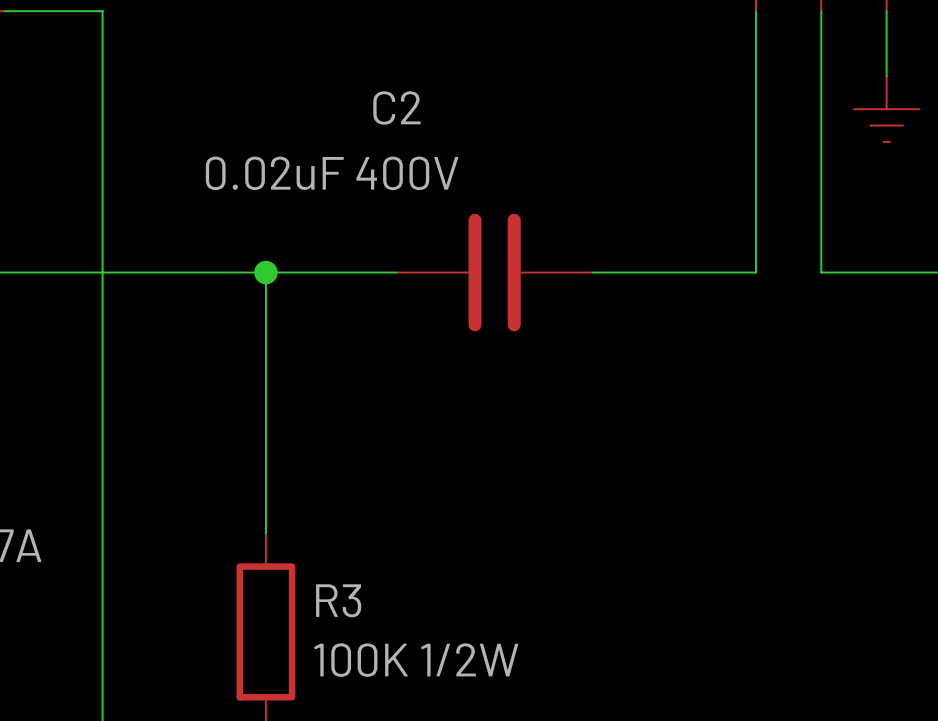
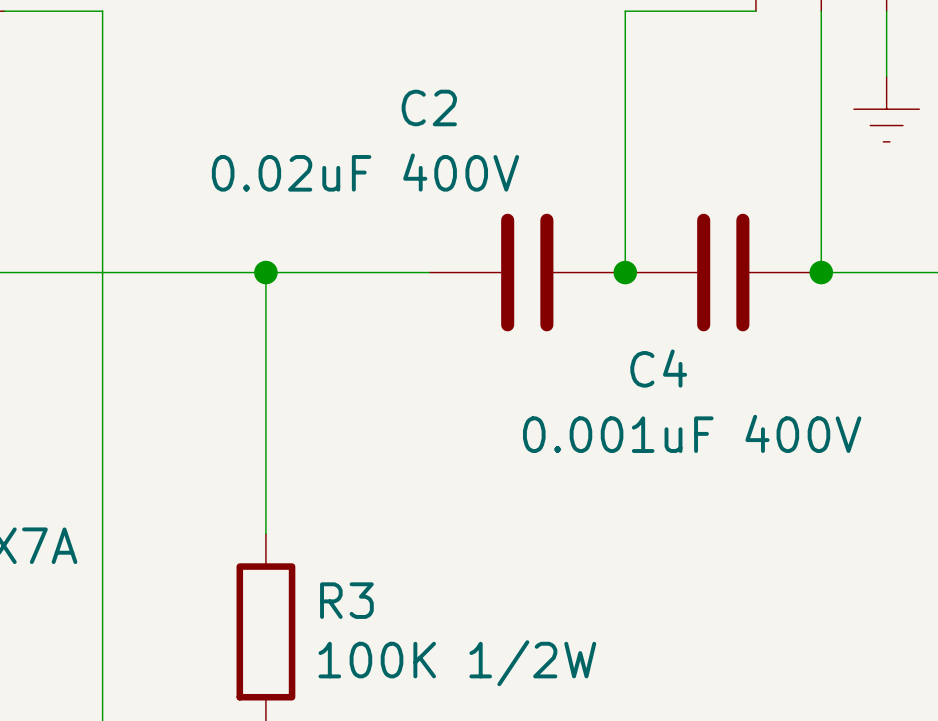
wire: (755, 11) (755, 272) (592, 272) -> (755, 11) (625, 11) (625, 272)
C2 position: (494, 272) -> (527, 272)
junction: none -> (625, 272)
C4: none -> 0.001uF 400V (723, 272)
junction: none -> (821, 272)

